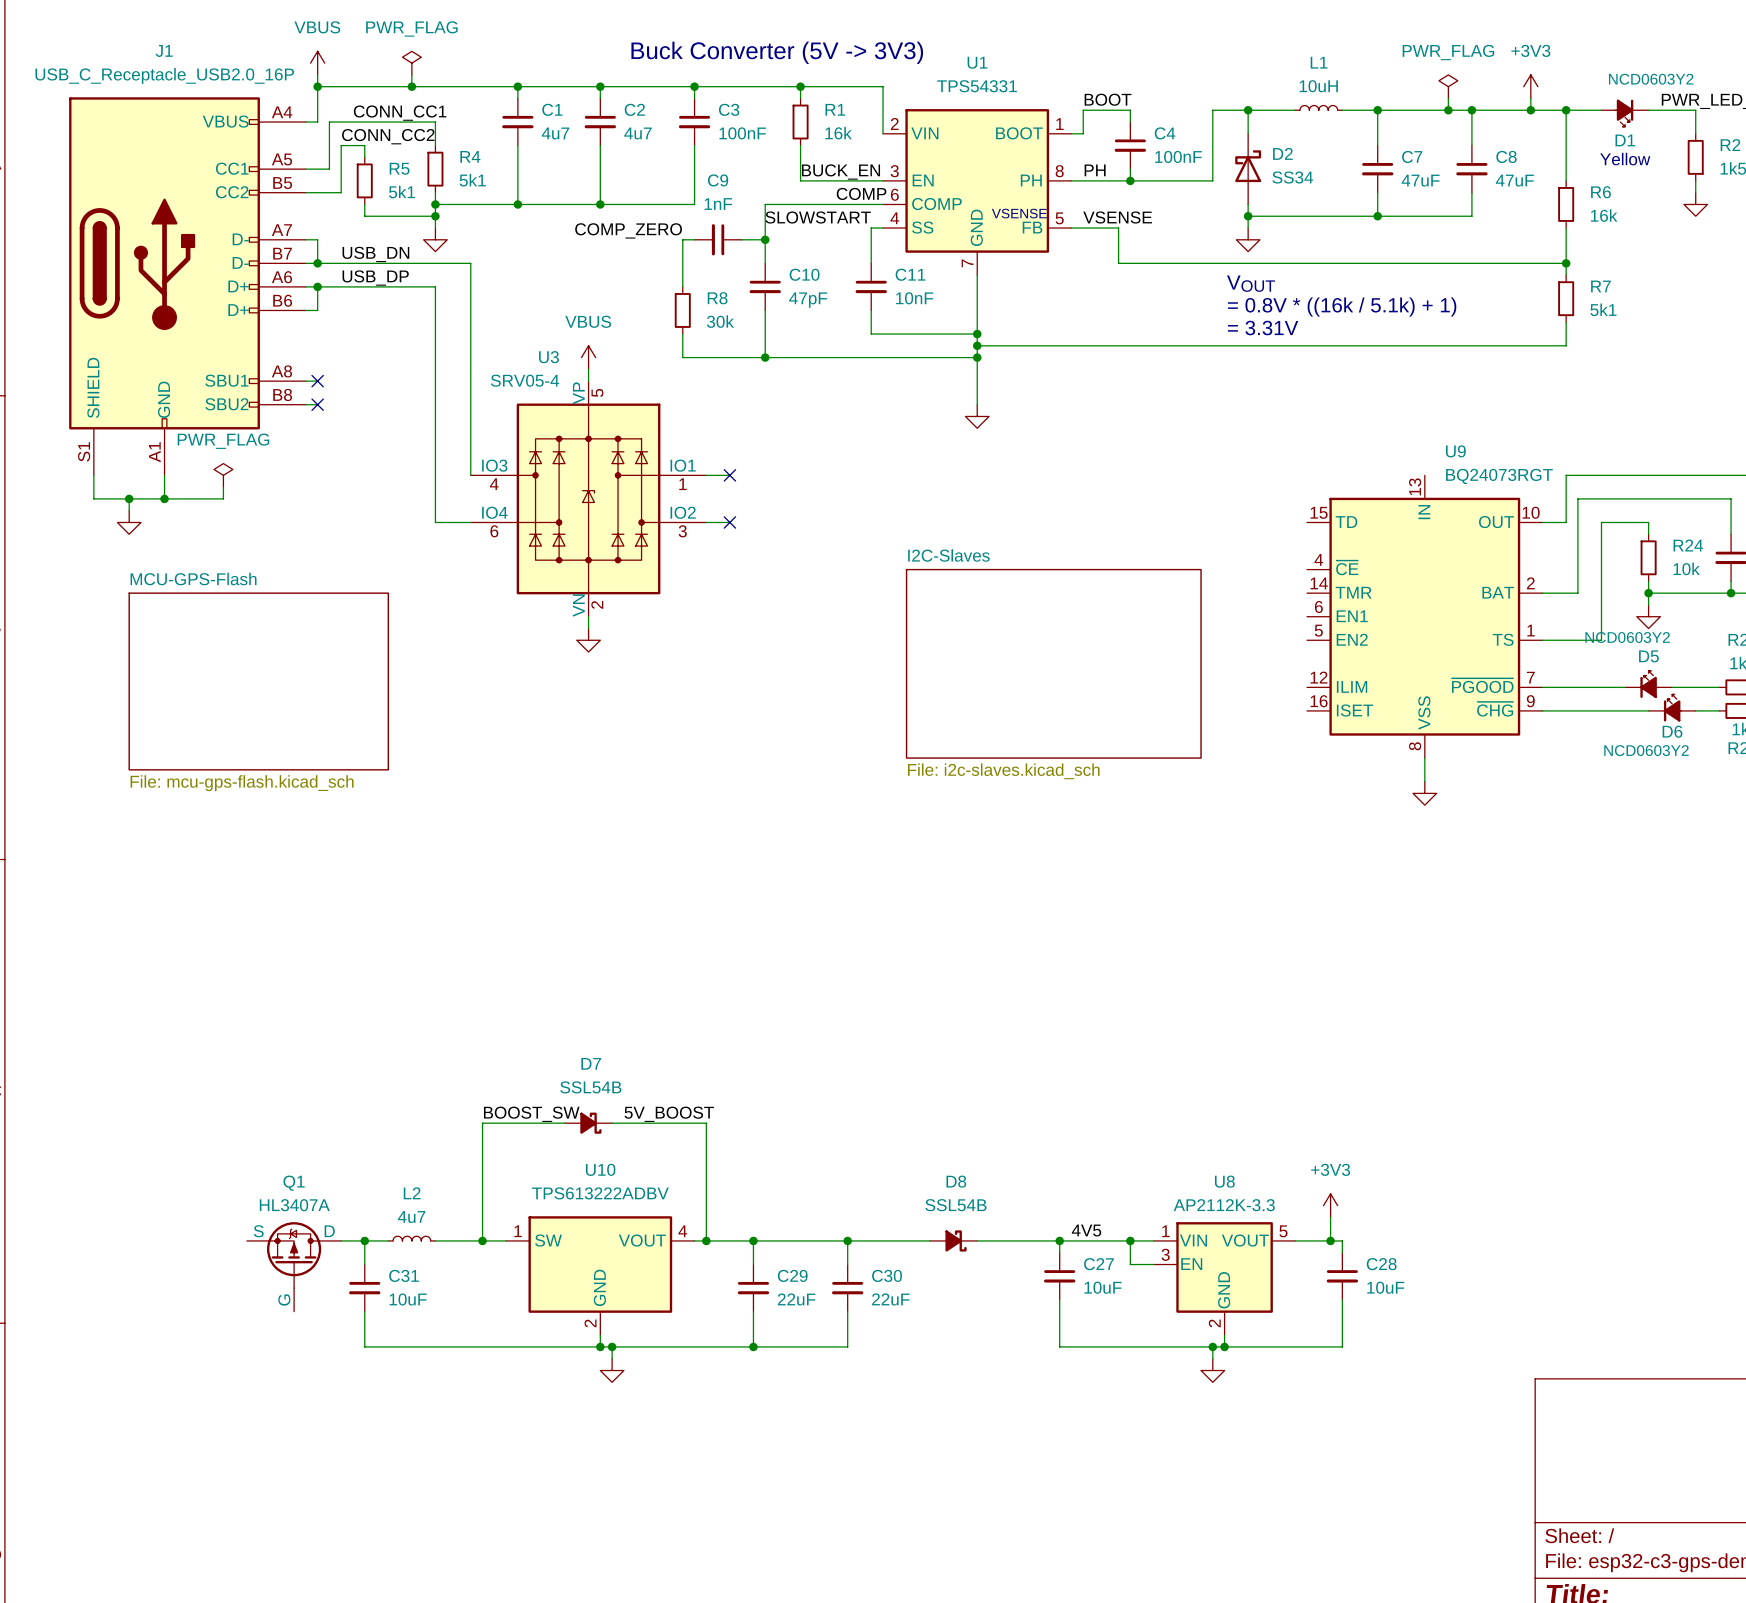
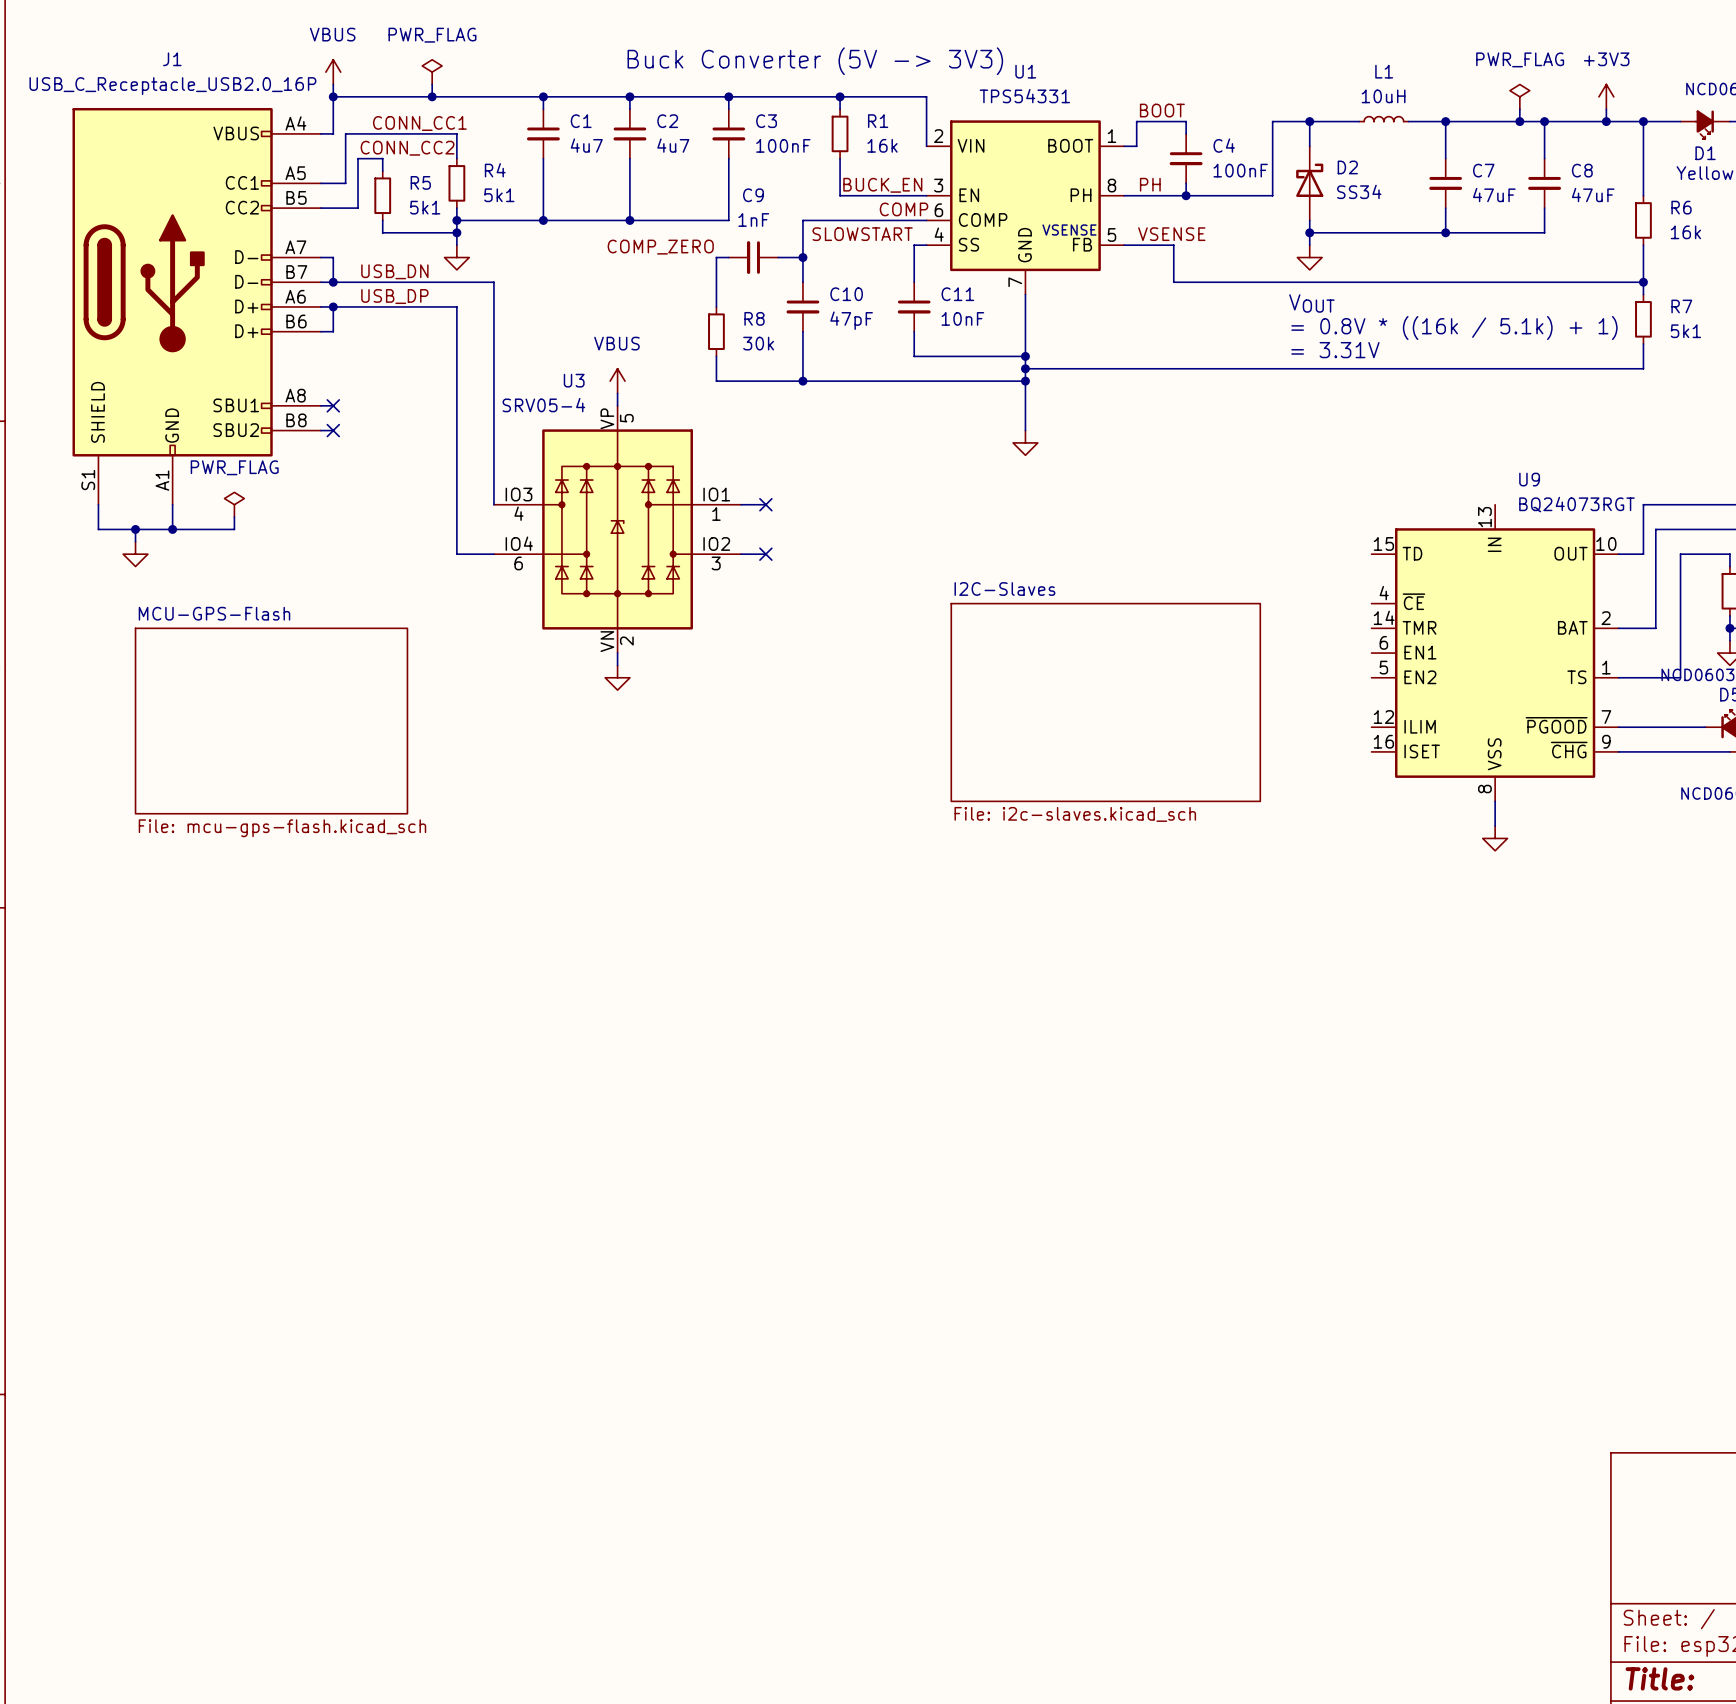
label: BOOST_SW (531, 1114) -> none
label: 5V_BOOST (669, 1114) -> none
wire: (564, 1123) (482, 1123) (482, 1240) -> none
D7: SSL54B (588, 1123) -> none
wire: (612, 1123) (706, 1123) (706, 1240) -> none
power symbol: +3V3 (1330, 1205) -> none
wire: (1330, 1217) (1330, 1240) -> none
label: 4V5 (1086, 1230) -> none
L2: 4u7 (411, 1238) -> none
wire: (341, 1240) (388, 1240) -> none
wire: (364, 1240) (364, 1264) -> none
junction: (364, 1240) -> none
wire: (435, 1240) (506, 1240) -> none
junction: (482, 1240) -> none
wire: (694, 1240) (930, 1240) -> none
junction: (706, 1240) -> none
wire: (753, 1240) (753, 1264) -> none
junction: (753, 1240) -> none
wire: (847, 1240) (847, 1264) -> none
junction: (847, 1240) -> none
D8: SSL54B (953, 1240) -> none
wire: (977, 1240) (1153, 1240) -> none
wire: (1059, 1240) (1059, 1252) -> none
junction: (1059, 1240) -> none
wire: (1130, 1240) (1130, 1264) (1153, 1264) -> none
junction: (1130, 1240) -> none
wire: (1295, 1240) (1342, 1240) (1342, 1252) -> none
junction: (1330, 1240) -> none
Q1: HL3407A (294, 1266) -> none
U10: TPS613222ADBV (600, 1275) -> none
C27: 10uF (1059, 1276) -> none
C28: 10uF (1342, 1276) -> none
U8: AP2112K-3.3 (1224, 1278) -> none
C31: 10uF (364, 1288) -> none
C29: 22uF (753, 1288) -> none
C30: 22uF (847, 1288) -> none
wire: (1059, 1299) (1059, 1346) (1342, 1346) (1342, 1299) -> none
wire: (364, 1311) (364, 1346) (847, 1346) (847, 1311) -> none
wire: (753, 1311) (753, 1346) -> none
wire: (600, 1335) (600, 1346) -> none
wire: (1224, 1335) (1224, 1346) -> none
junction: (600, 1346) -> none
wire: (612, 1346) (612, 1358) -> none
junction: (612, 1346) -> none
junction: (753, 1346) -> none
wire: (1212, 1346) (1212, 1358) -> none
junction: (1212, 1346) -> none
junction: (1224, 1346) -> none
power symbol: (612, 1370) -> none
power symbol: (1212, 1370) -> none

